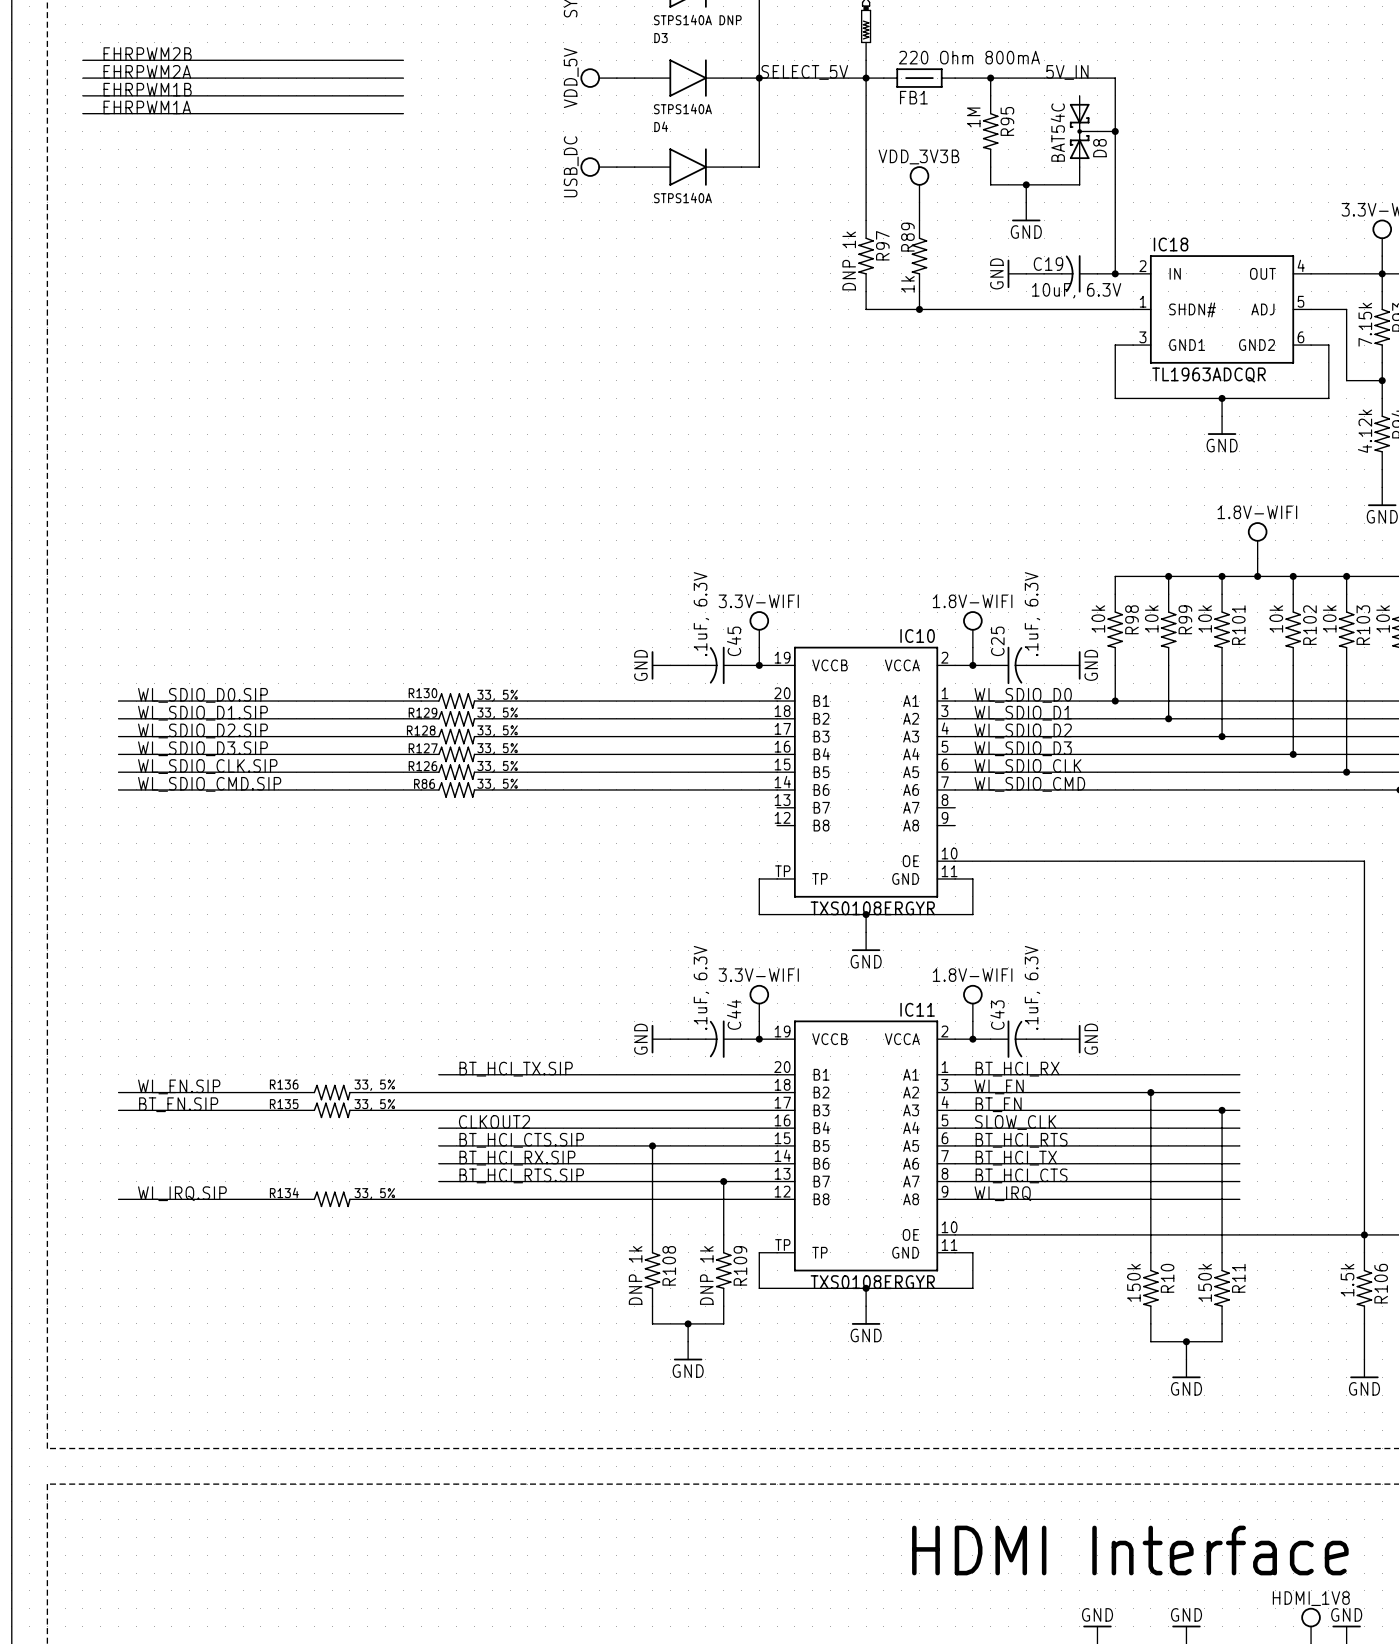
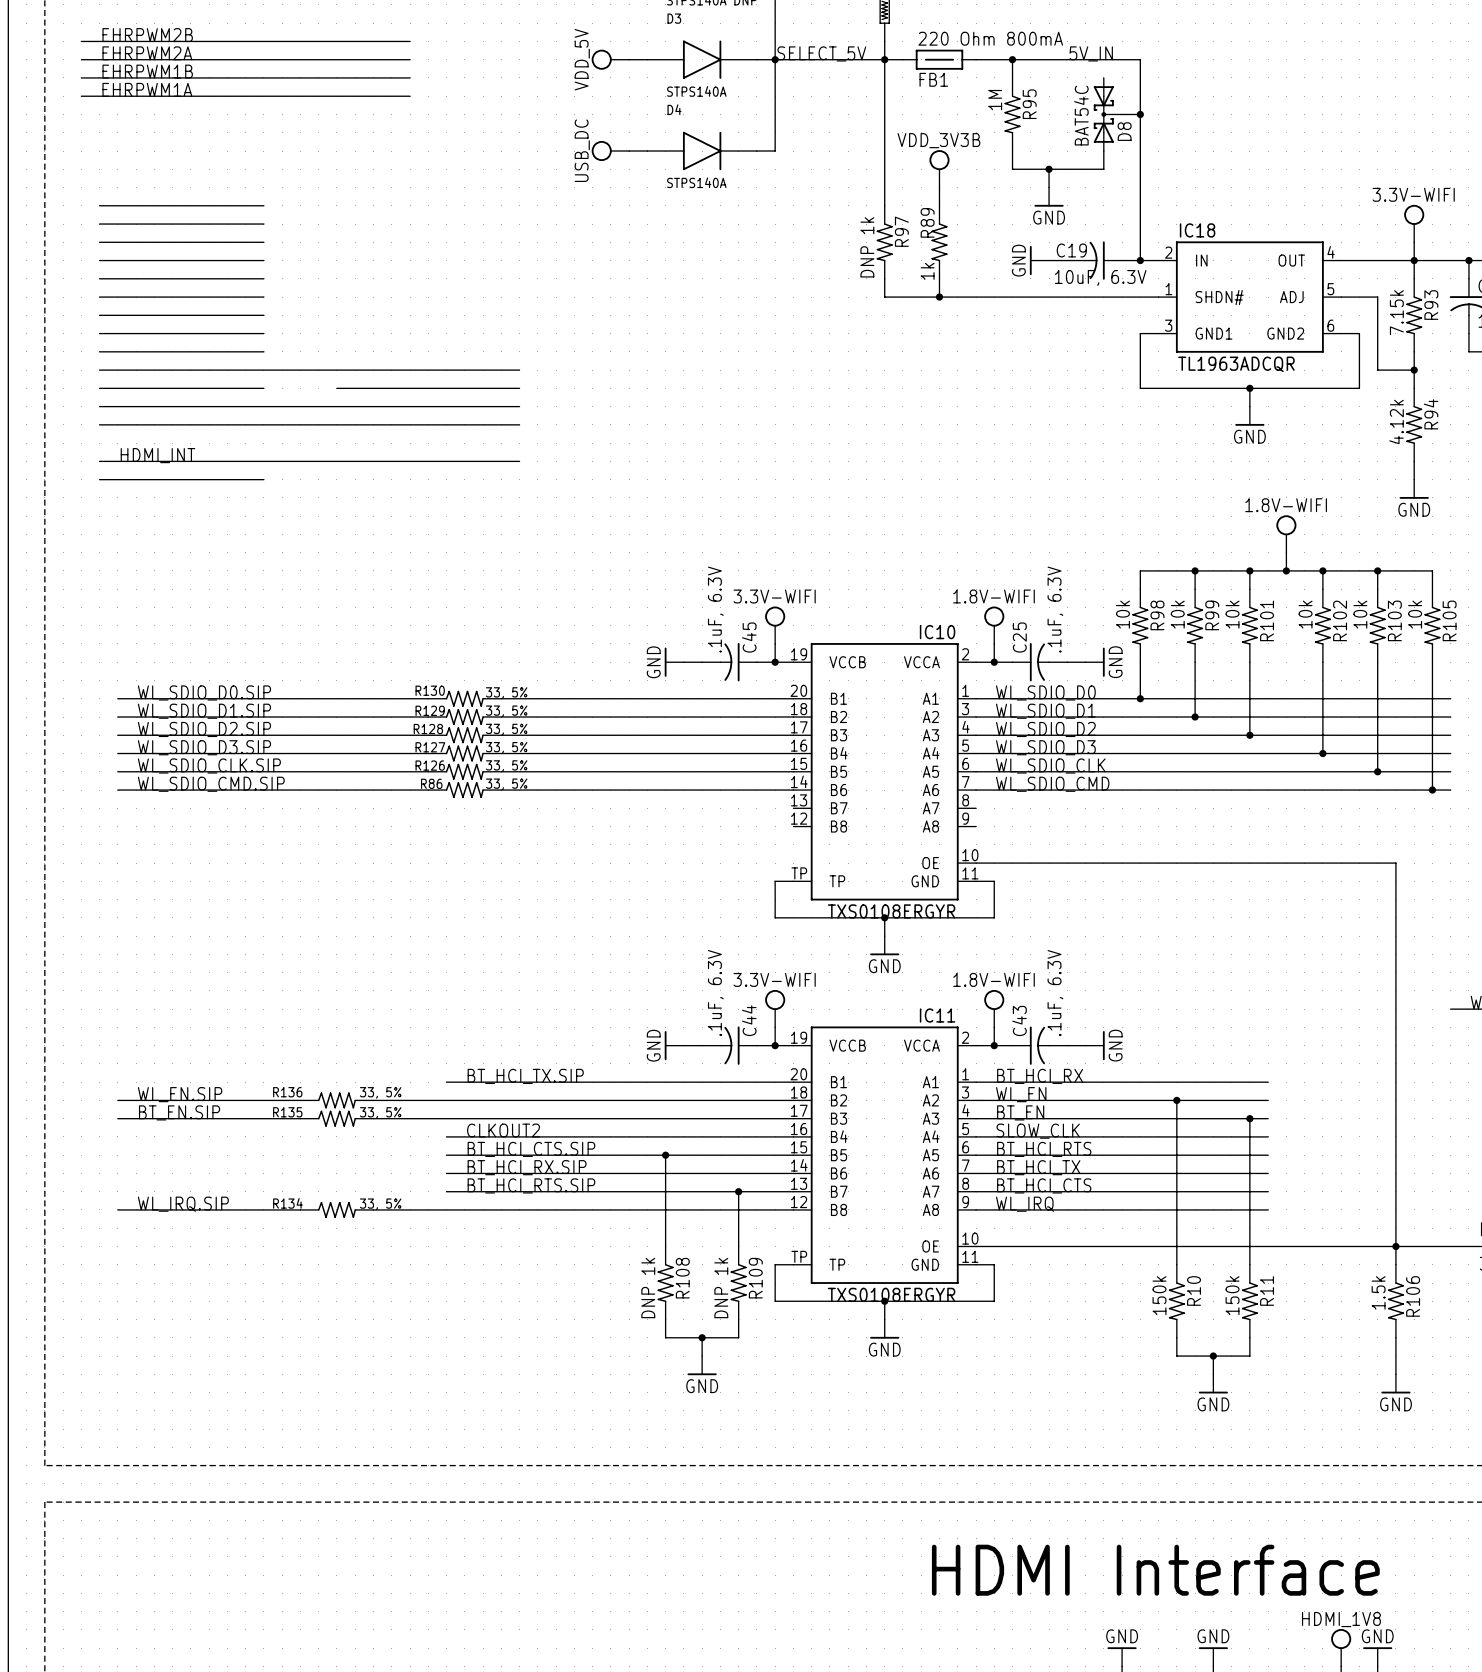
wire: none -> (99, 205) (263, 205)
wire: none -> (99, 224) (263, 224)
wire: none -> (99, 242) (263, 242)
wire: none -> (99, 260) (263, 260)
wire: none -> (99, 278) (263, 278)
wire: none -> (99, 297) (263, 297)
wire: none -> (99, 315) (263, 315)
wire: none -> (99, 333) (263, 333)
wire: none -> (99, 351) (263, 351)
wire: none -> (99, 370) (519, 370)
wire: none -> (99, 388) (263, 388)
wire: none -> (336, 388) (519, 388)
wire: none -> (99, 406) (519, 406)
wire: none -> (99, 424) (519, 424)
label: none -> HDMI_INT (157, 455)
wire: none -> (99, 461) (519, 461)
wire: none -> (99, 479) (263, 479)

